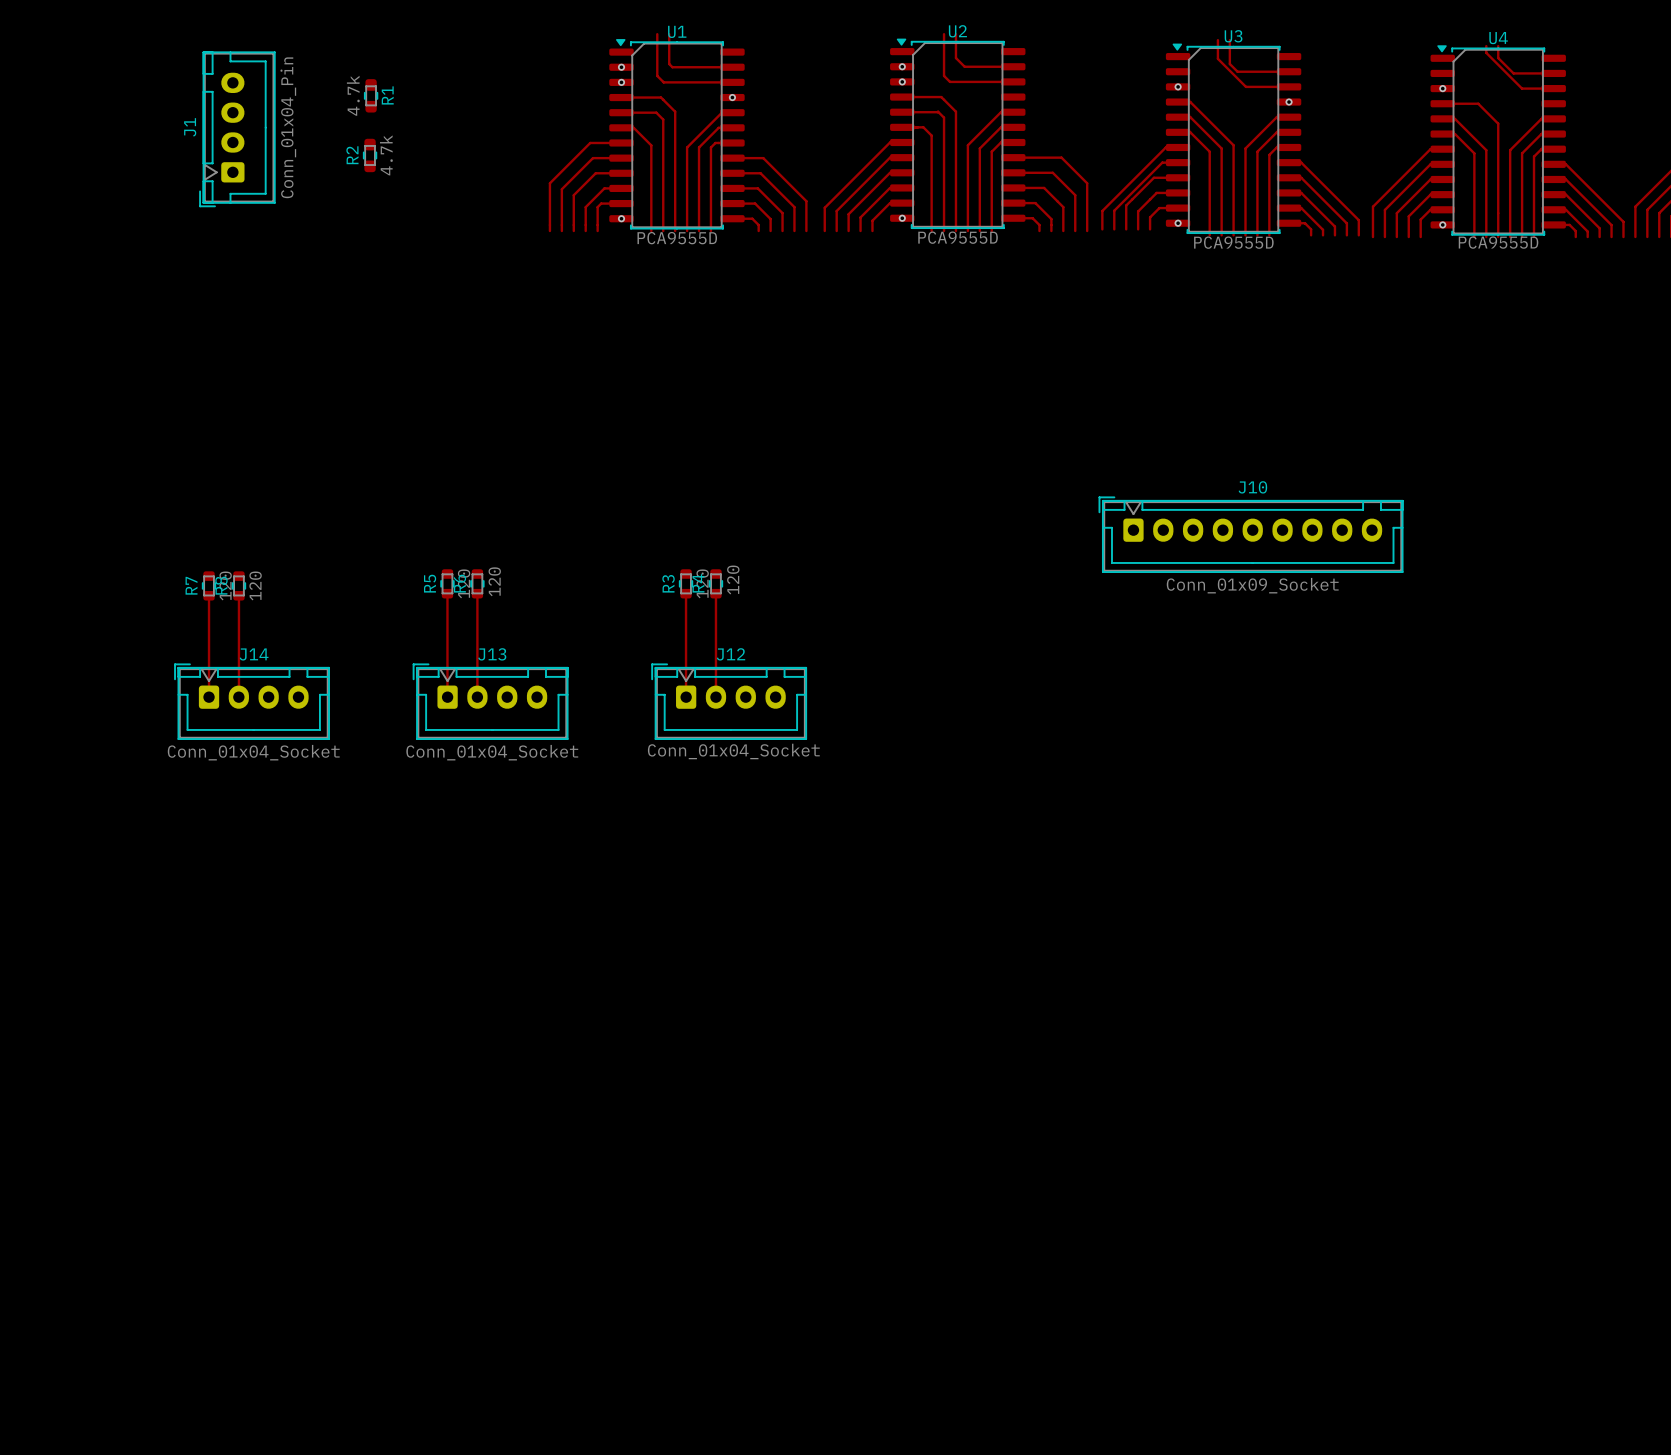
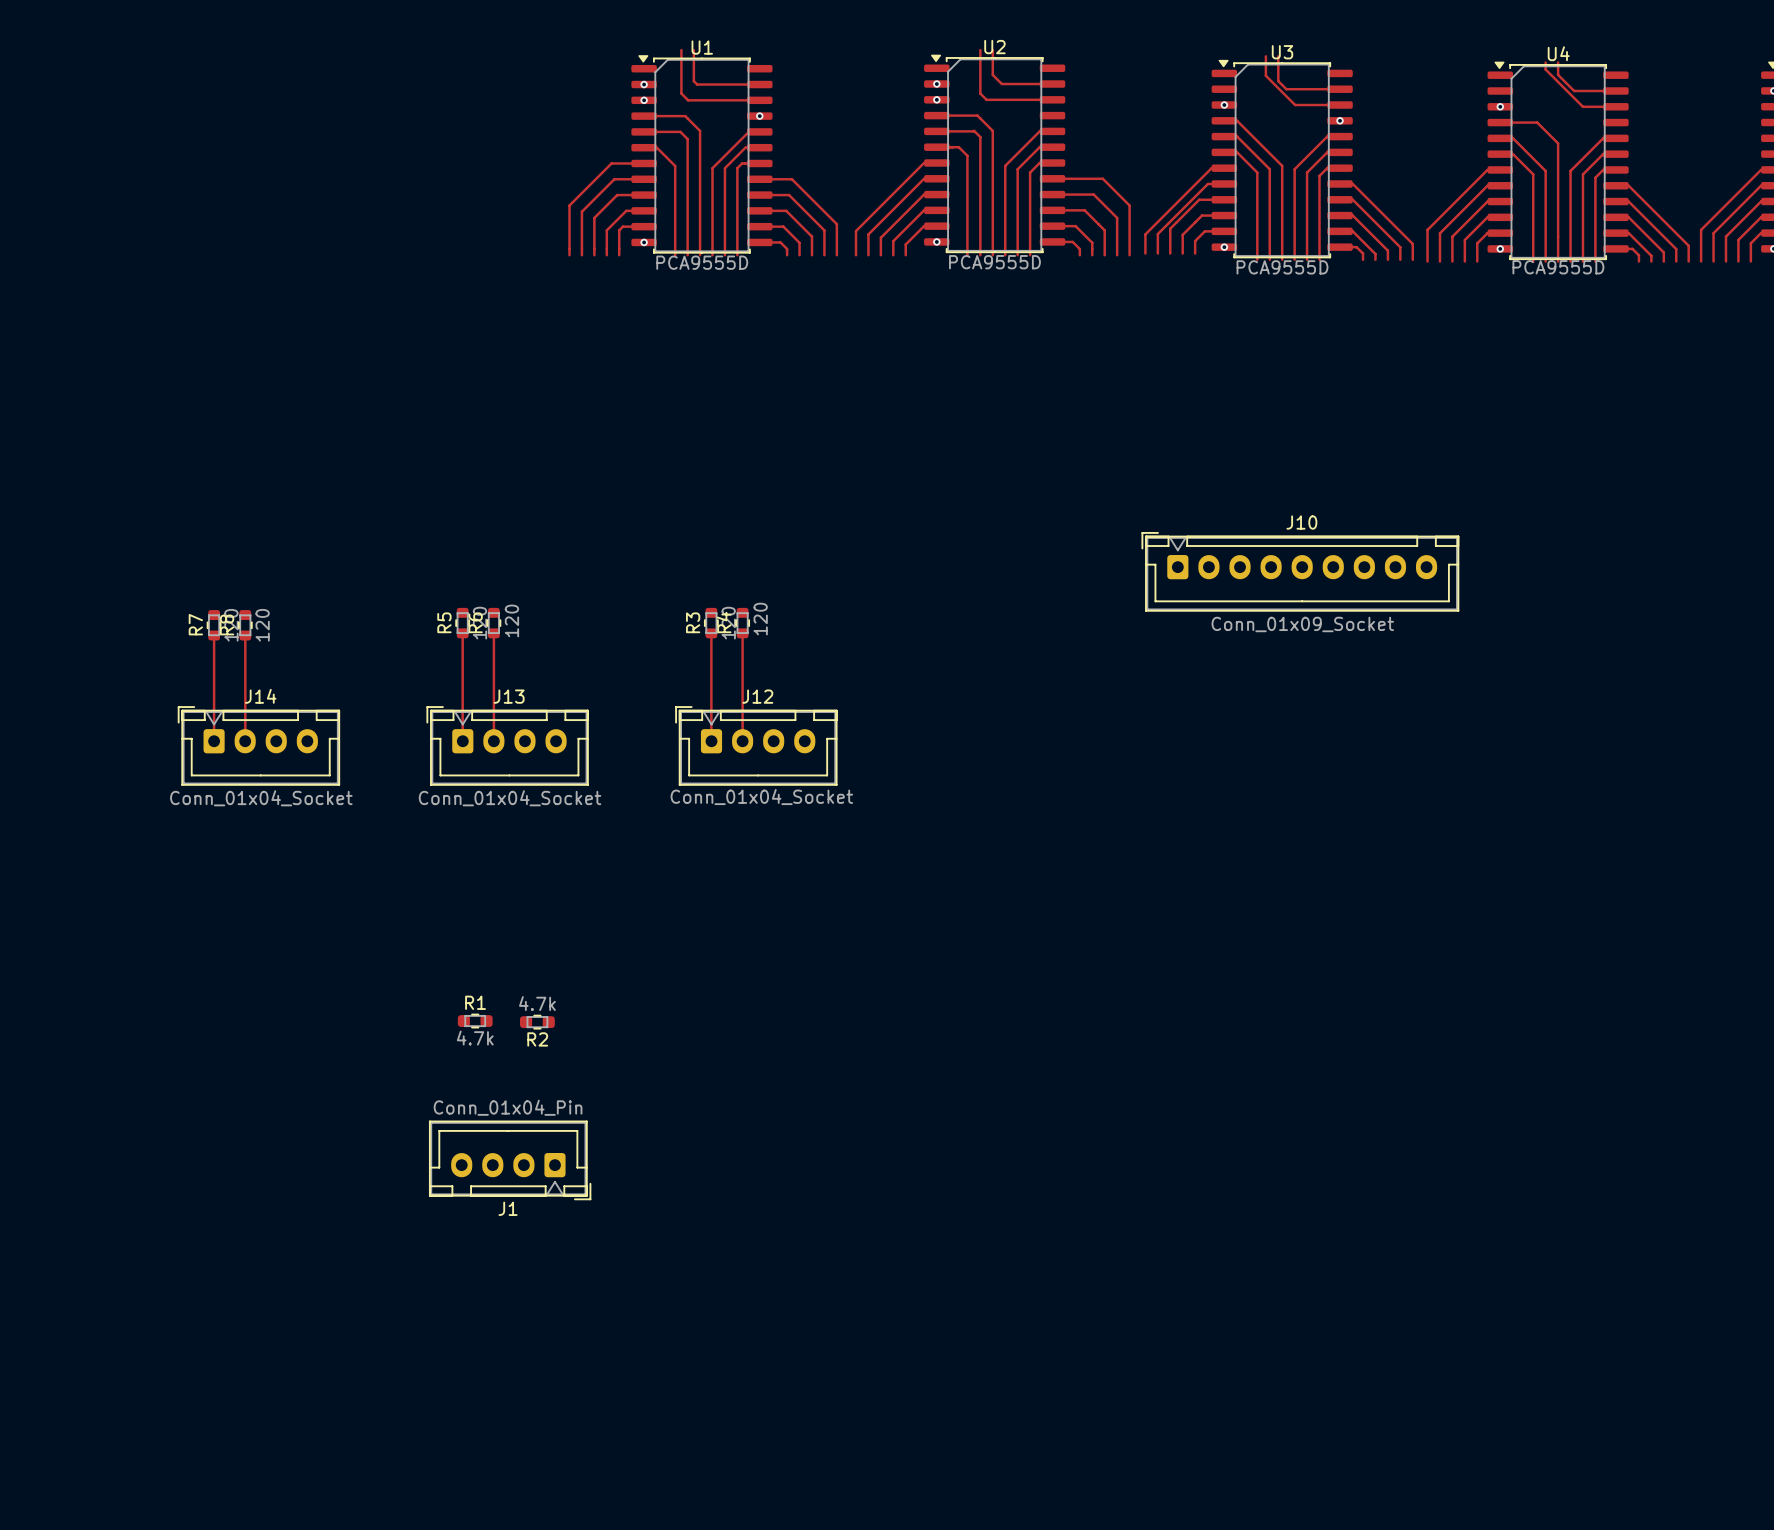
R1 value position: 4.7k (353, 95) -> 4.7k (475, 1038)
R1 rotation: 0° (371, 95) -> 90° clockwise (475, 1021)
R1 position: (371, 95) -> (475, 1021)
R1 name position: R1 (387, 95) -> R1 (475, 1002)
J1 rotation: 0° (237, 129) -> 90° counterclockwise (510, 1160)
J1 position: (237, 129) -> (510, 1160)
R2 name position: R2 (352, 155) -> R2 (537, 1039)
R2 rotation: 0° (370, 155) -> 90° clockwise (537, 1022)
R2 position: (370, 155) -> (537, 1022)
R2 value position: 4.7k (386, 155) -> 4.7k (537, 1003)

